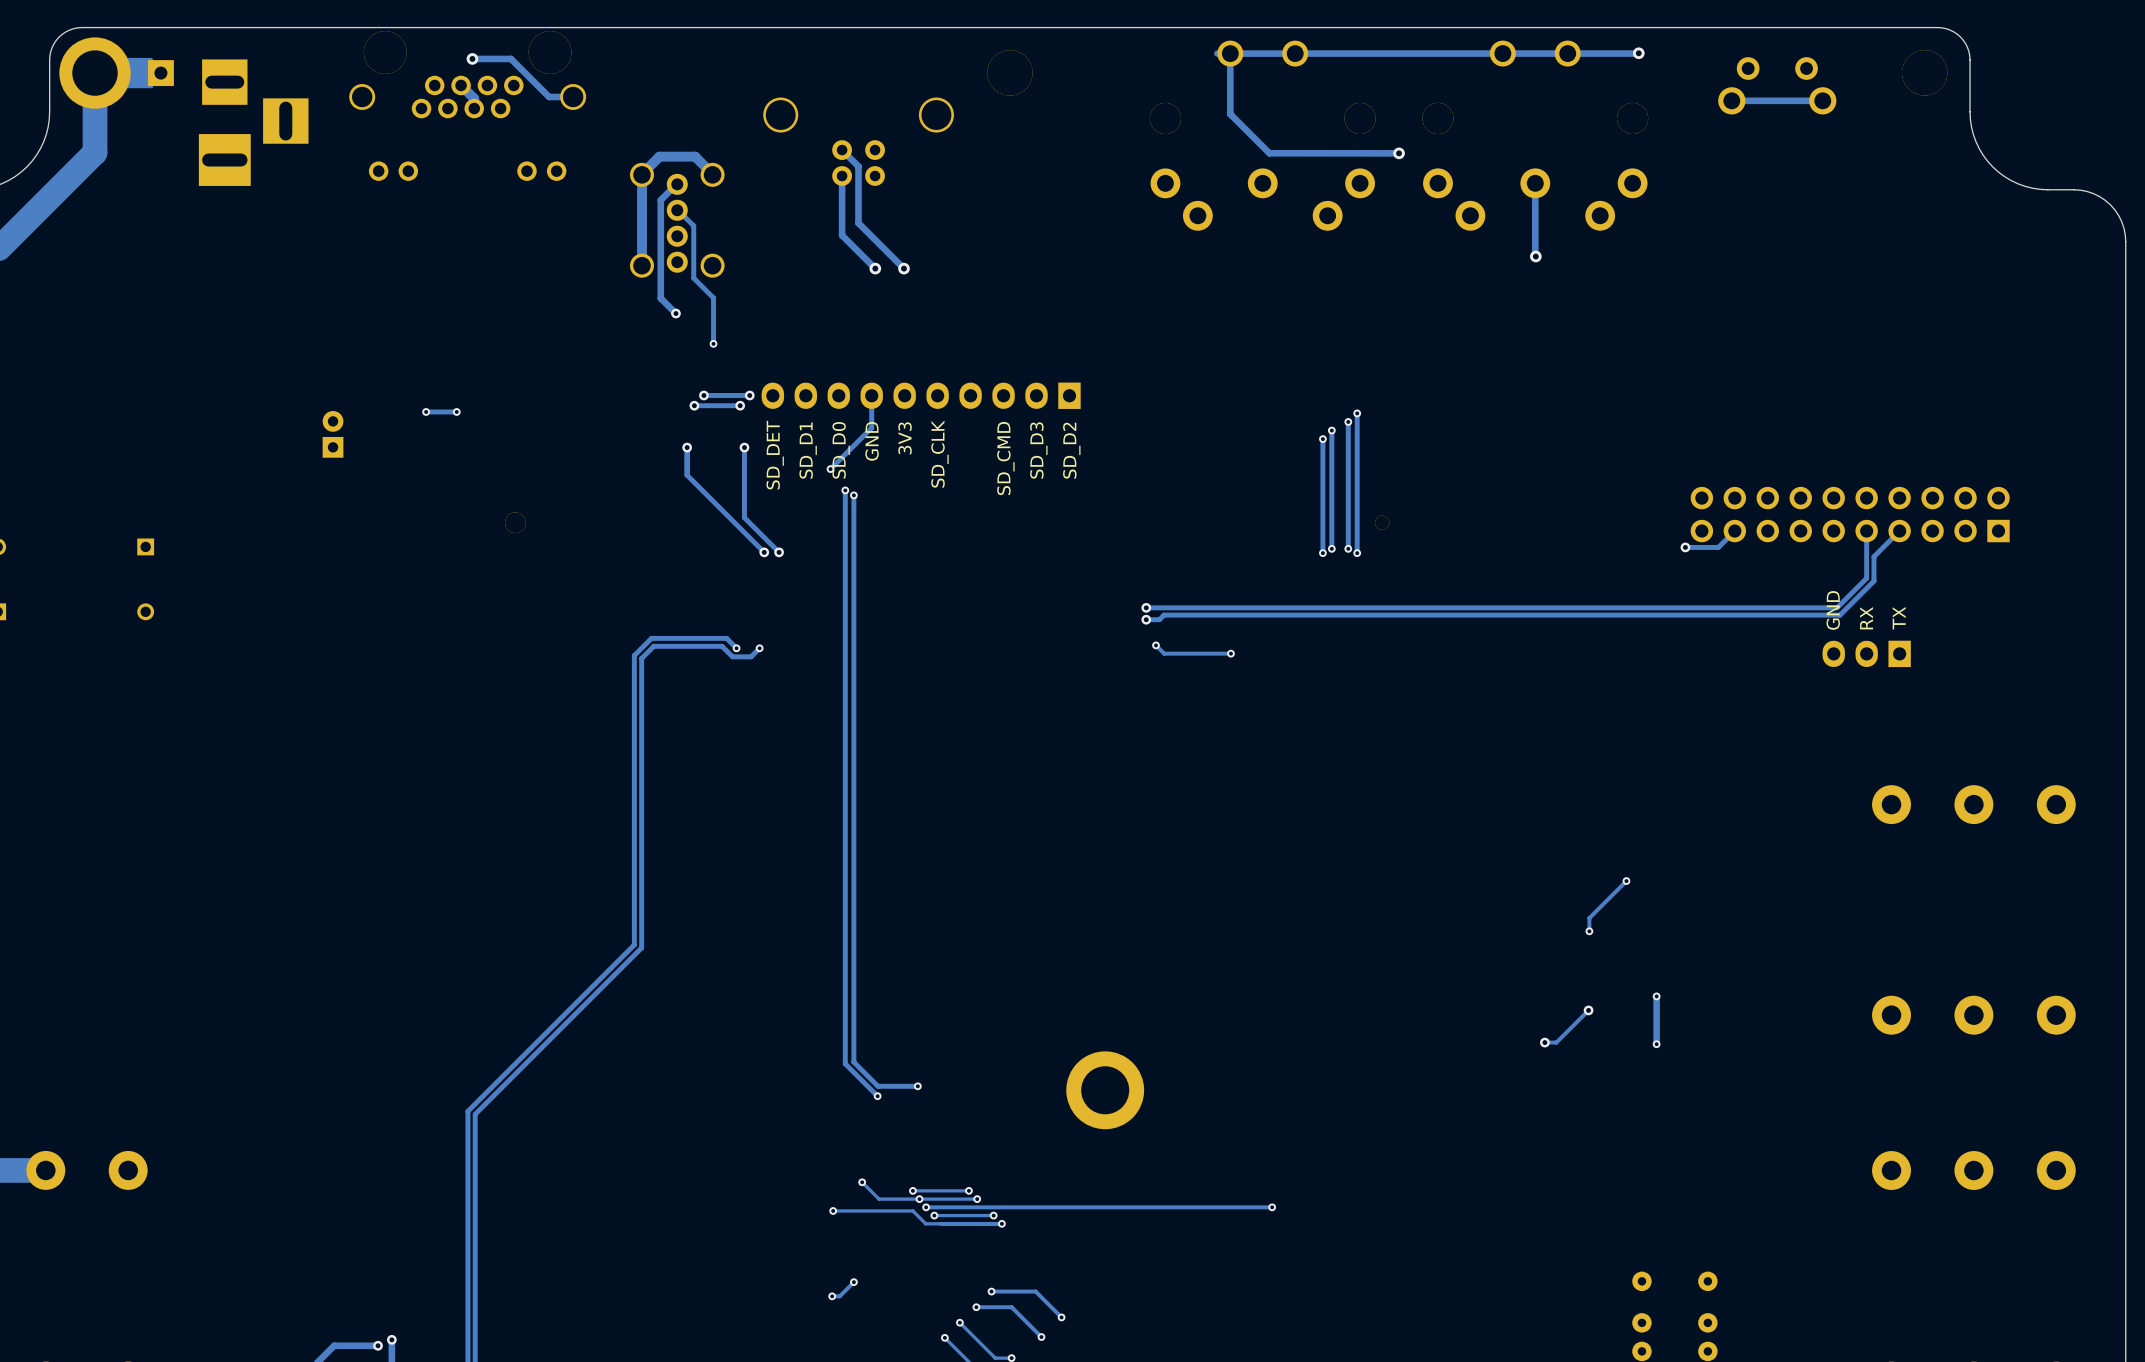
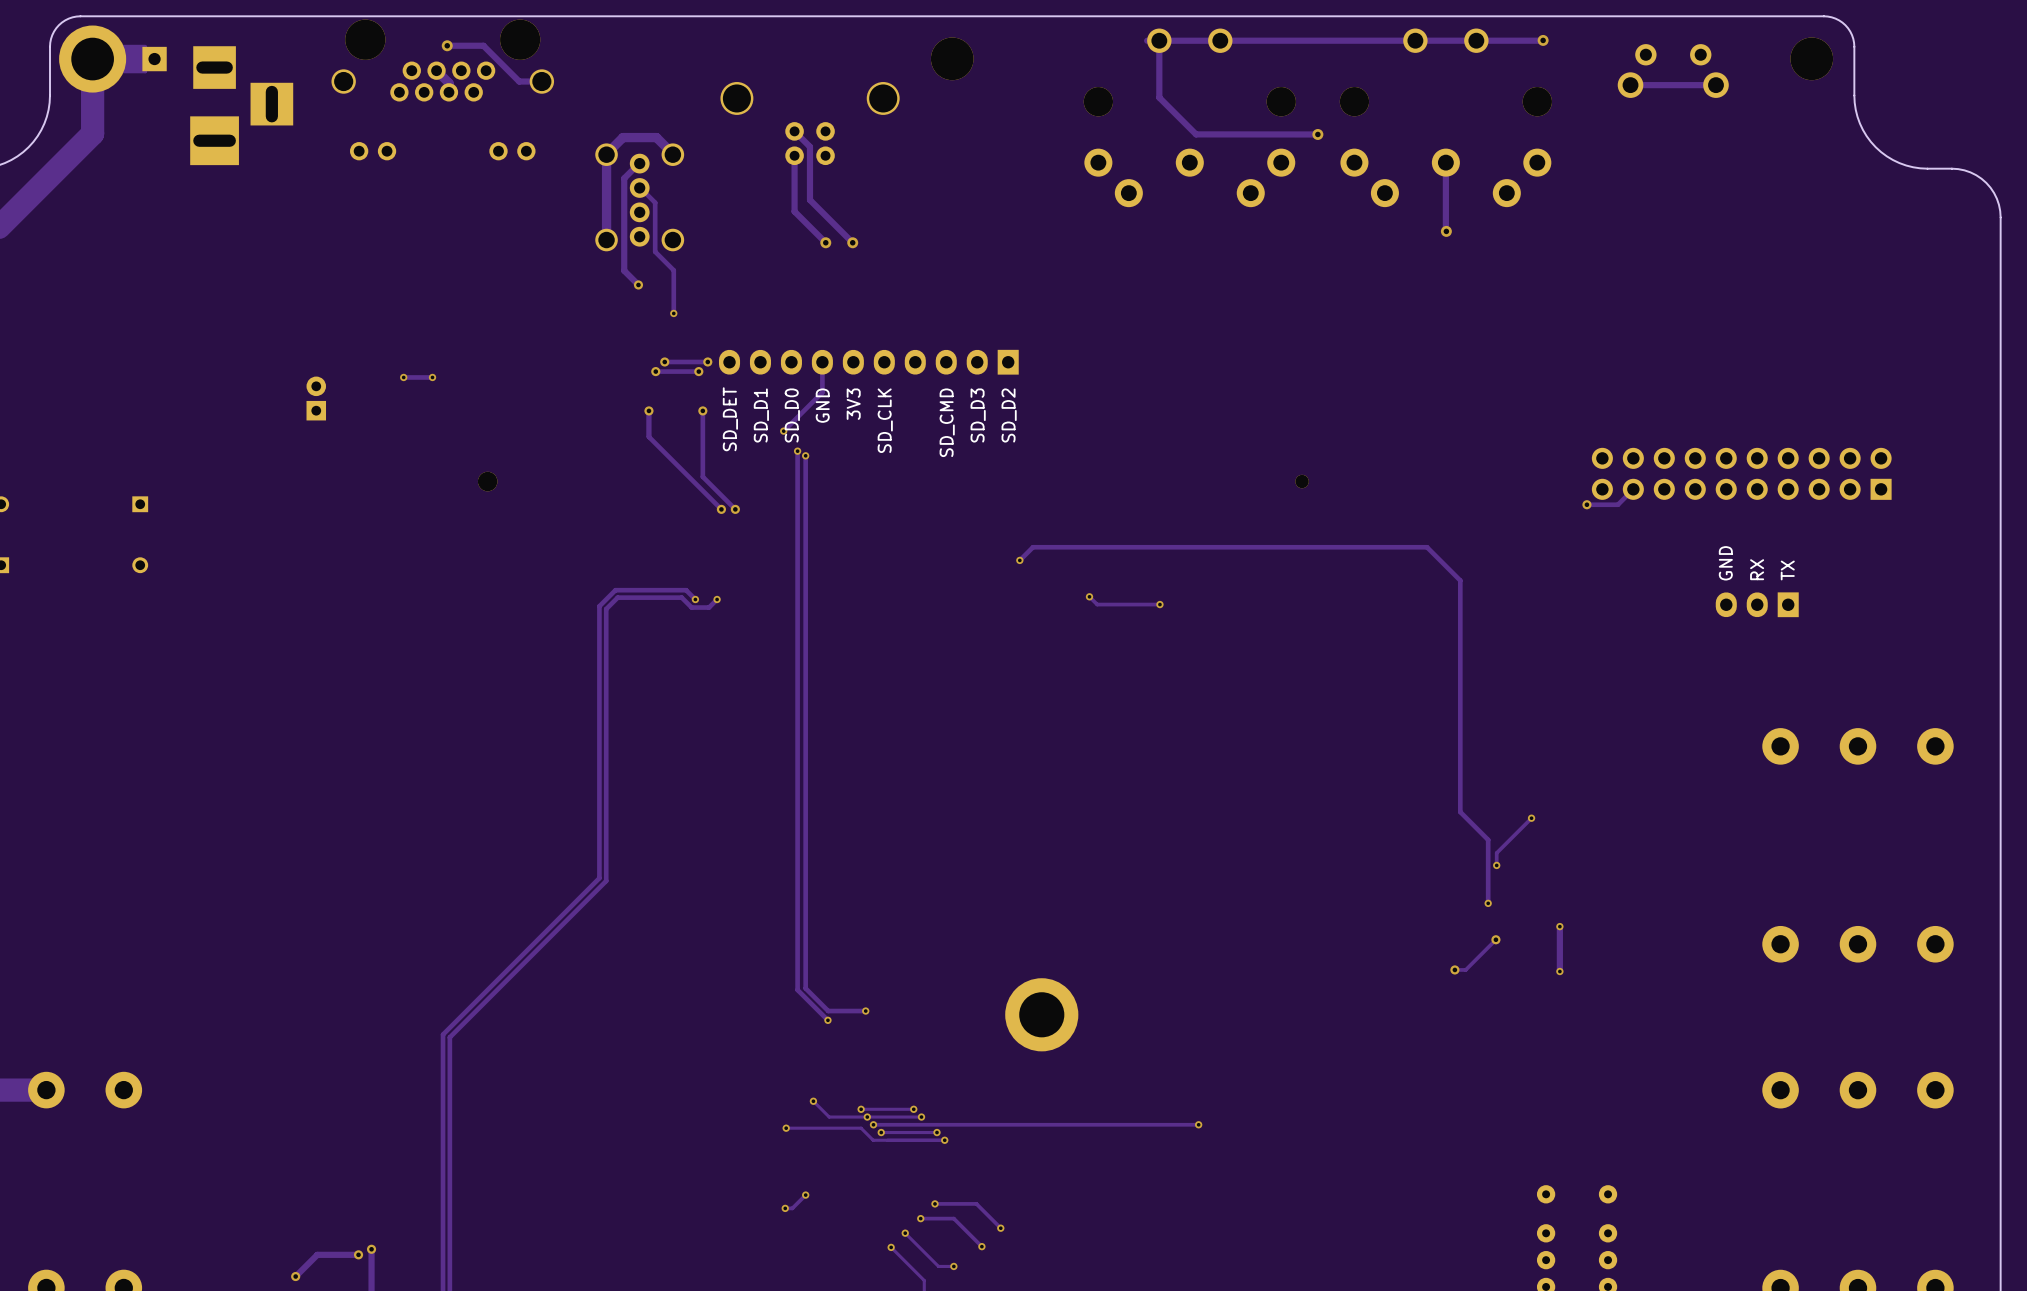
track: (1357, 413) (1357, 553) -> none
via: (1357, 413) -> none
track: (1348, 421) (1348, 548) -> none
via: (1348, 421) -> none
track: (1331, 430) (1331, 548) -> none
via: (1331, 430) -> none
track: (1322, 439) (1322, 553) -> none
via: (1322, 439) -> none
track: (1866, 531) (1866, 578) (1837, 607) (1146, 607) -> none
track: (1899, 531) (1873, 556) (1873, 581) (1840, 615) (1164, 615) (1159, 619) (1146, 619) -> none
via: (1331, 548) -> none
via: (1348, 548) -> none
via: (1322, 553) -> none
via: (1357, 553) -> none
track: none -> (1019, 560) (1032, 547) (1427, 547) (1460, 580) (1460, 812) (1488, 839) (1488, 903)
via: none -> (1019, 560)
via: (1146, 607) -> none
via: (1146, 619) -> none
via: none -> (1488, 903)

